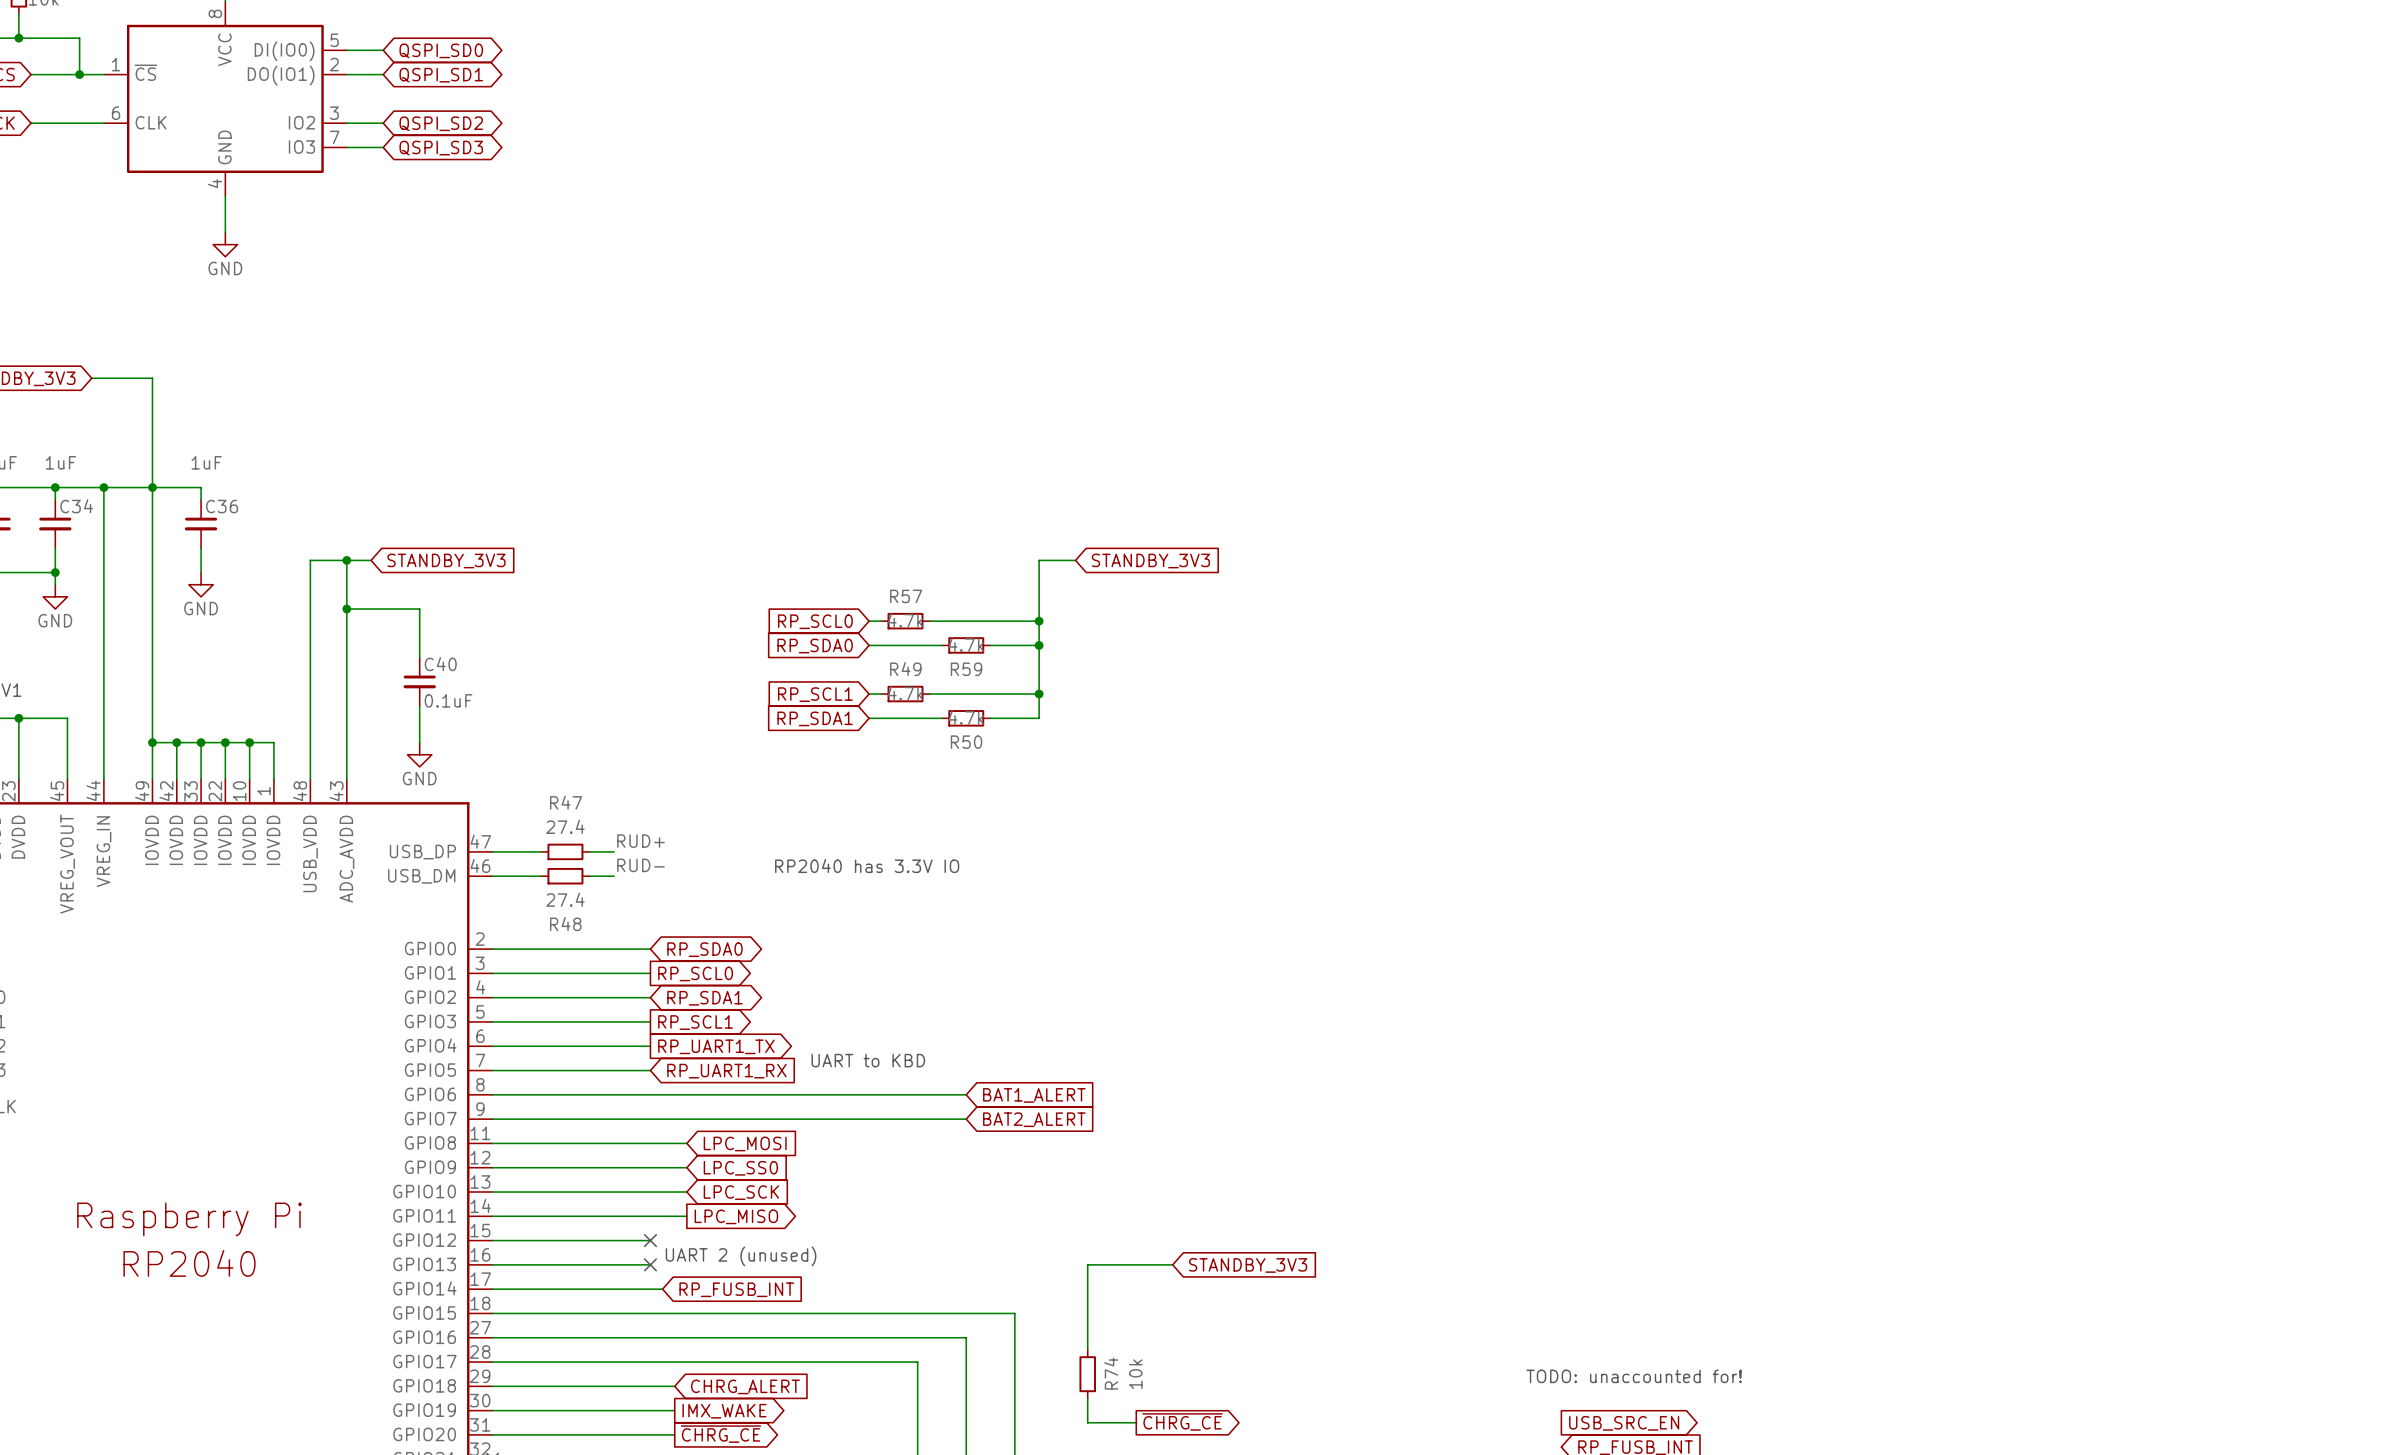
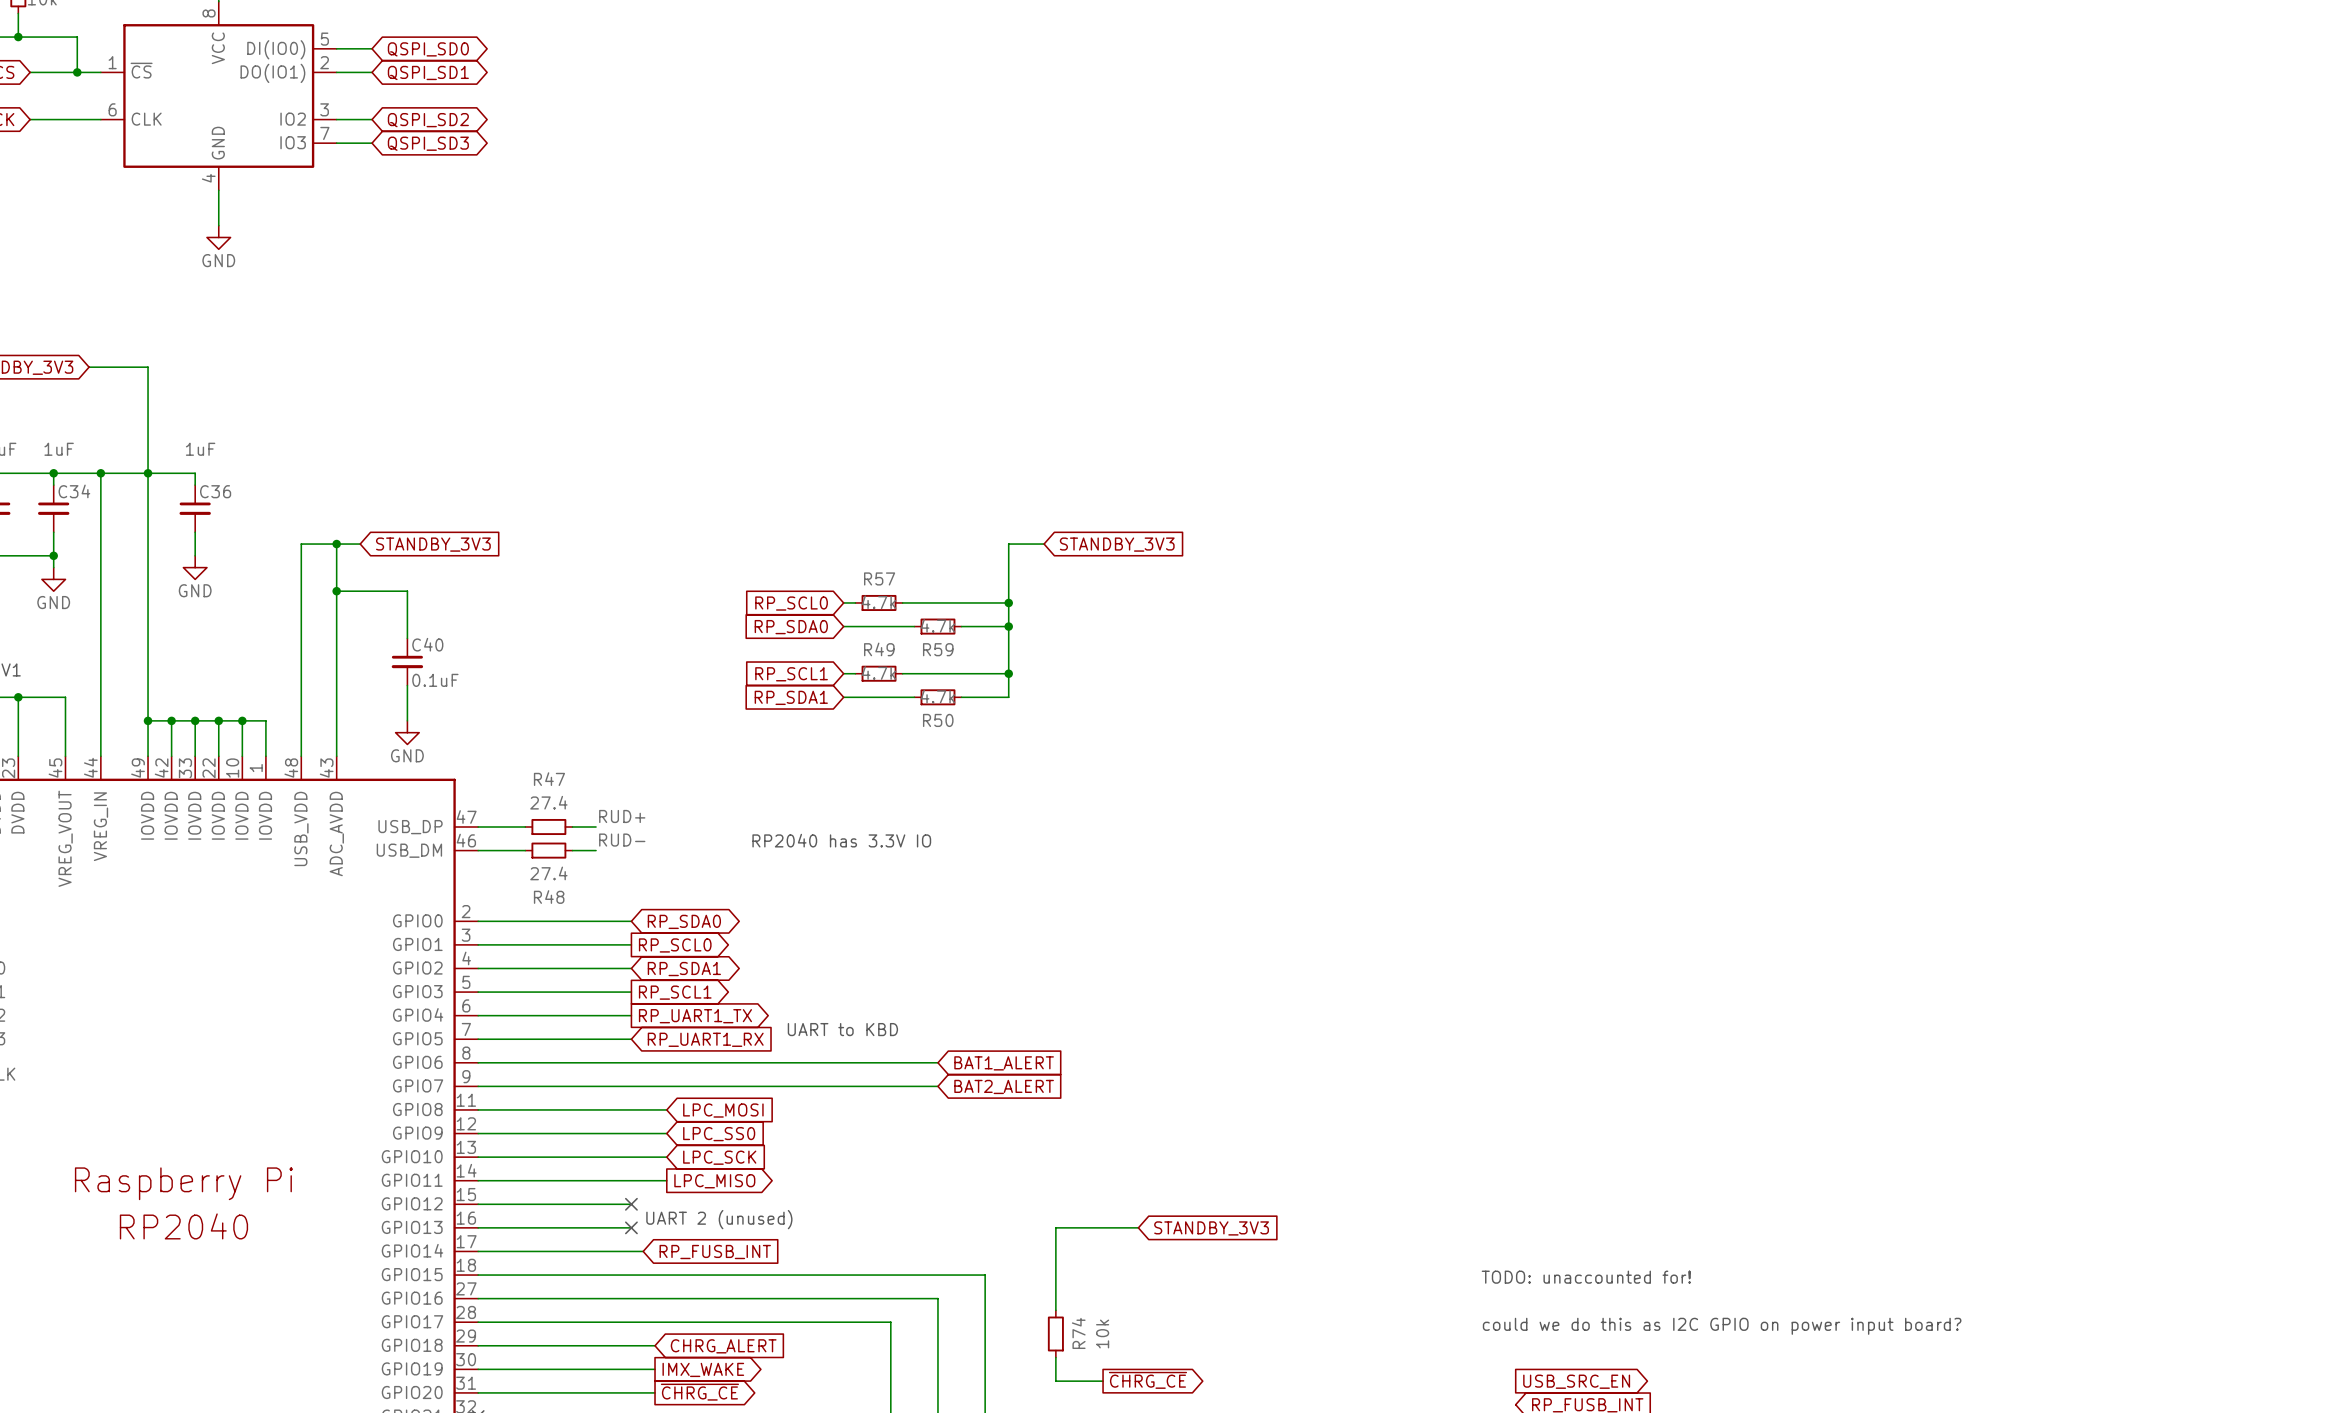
text: none -> could we do this as I2C GPIO on power input board? (1722, 1326)
text position: TODO: unaccounted for! (1634, 1376) -> TODO: unaccounted for! (1586, 1277)

